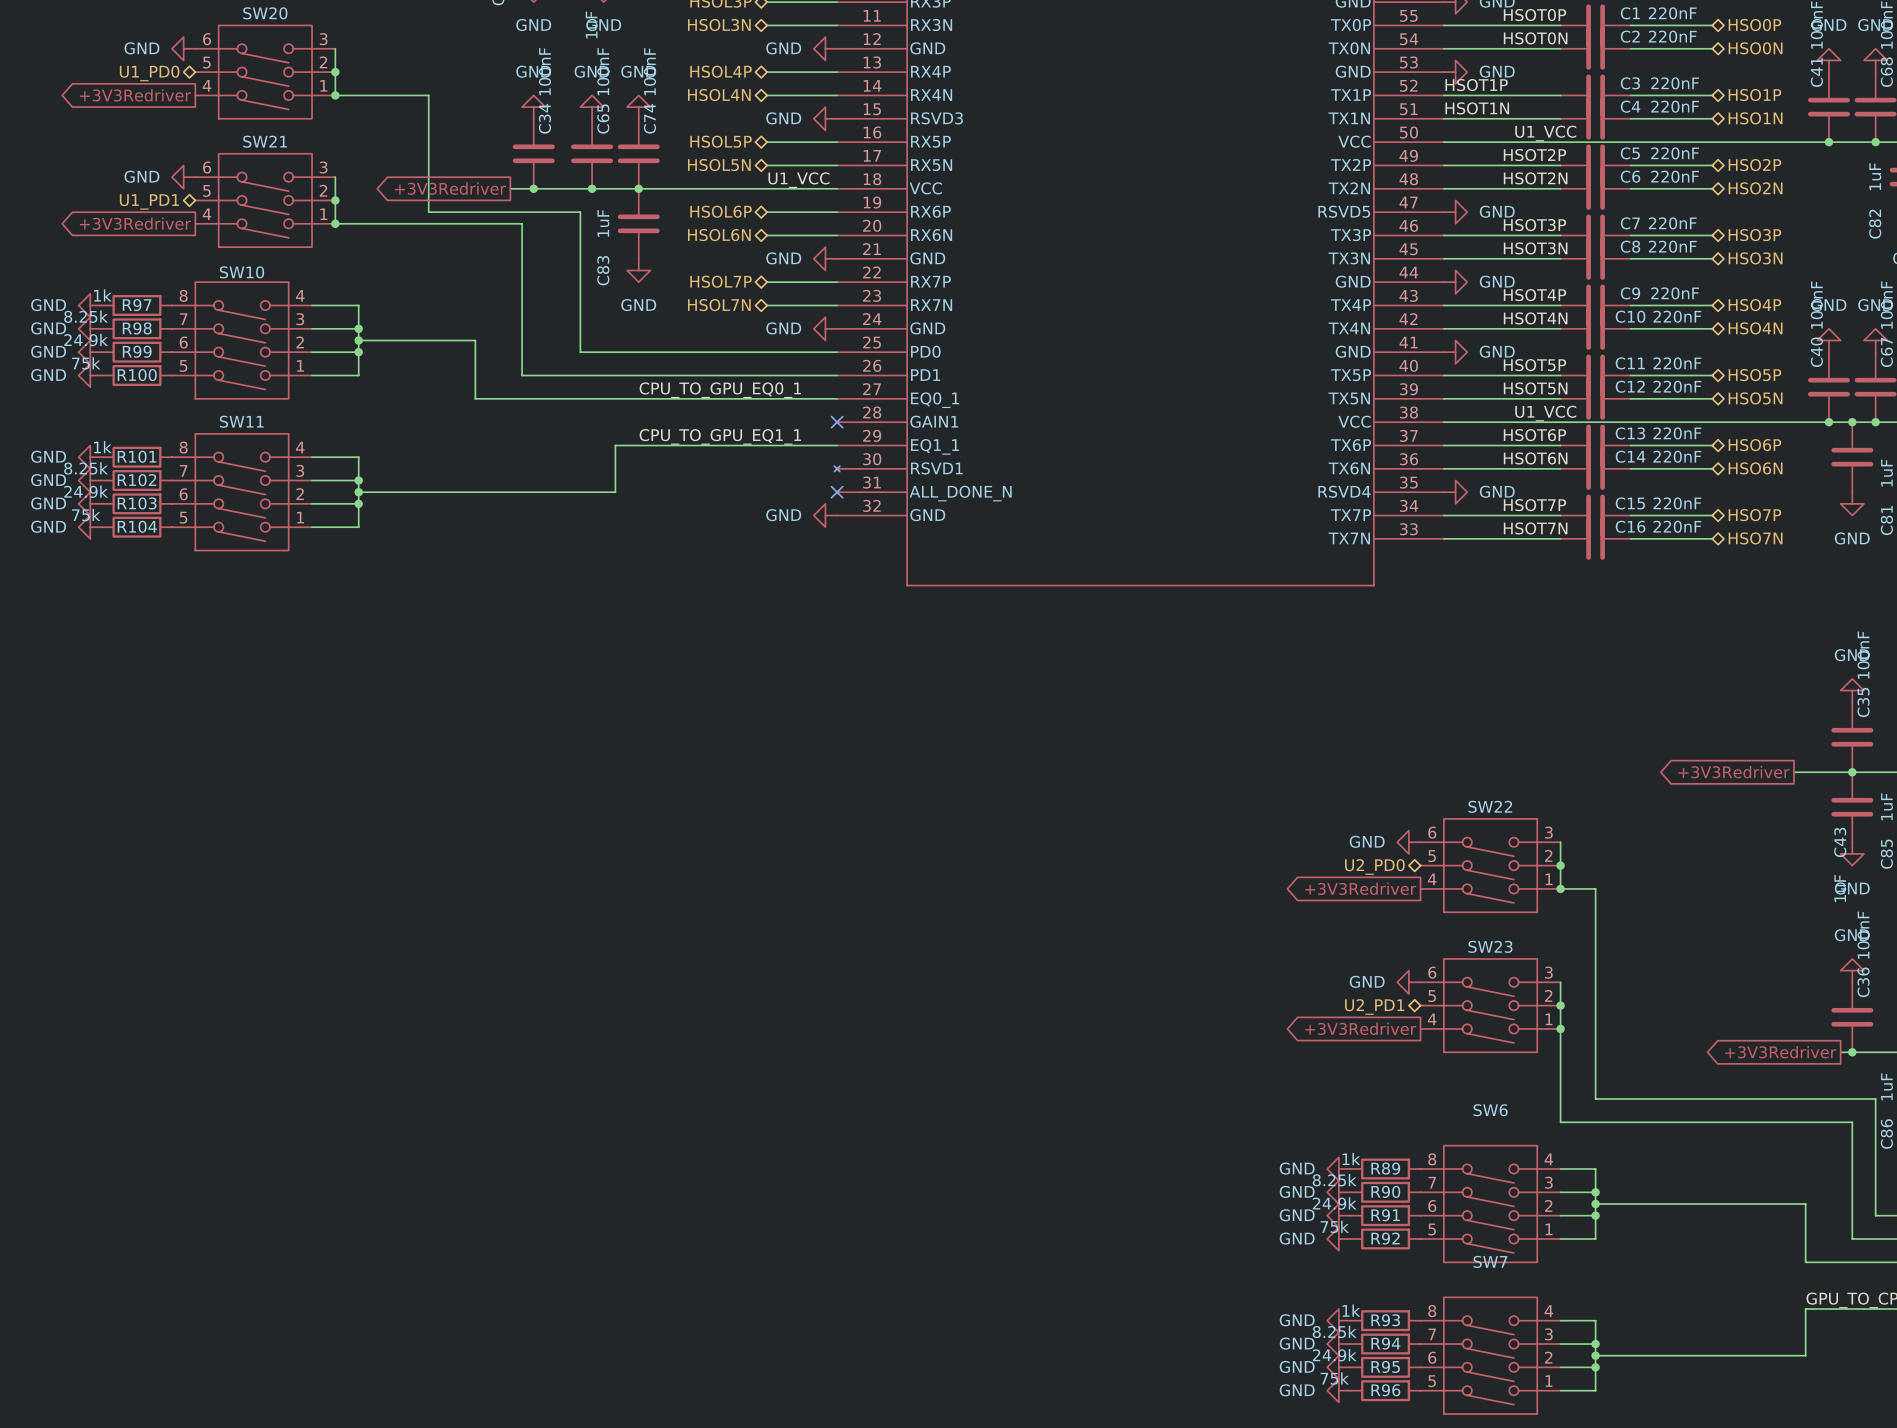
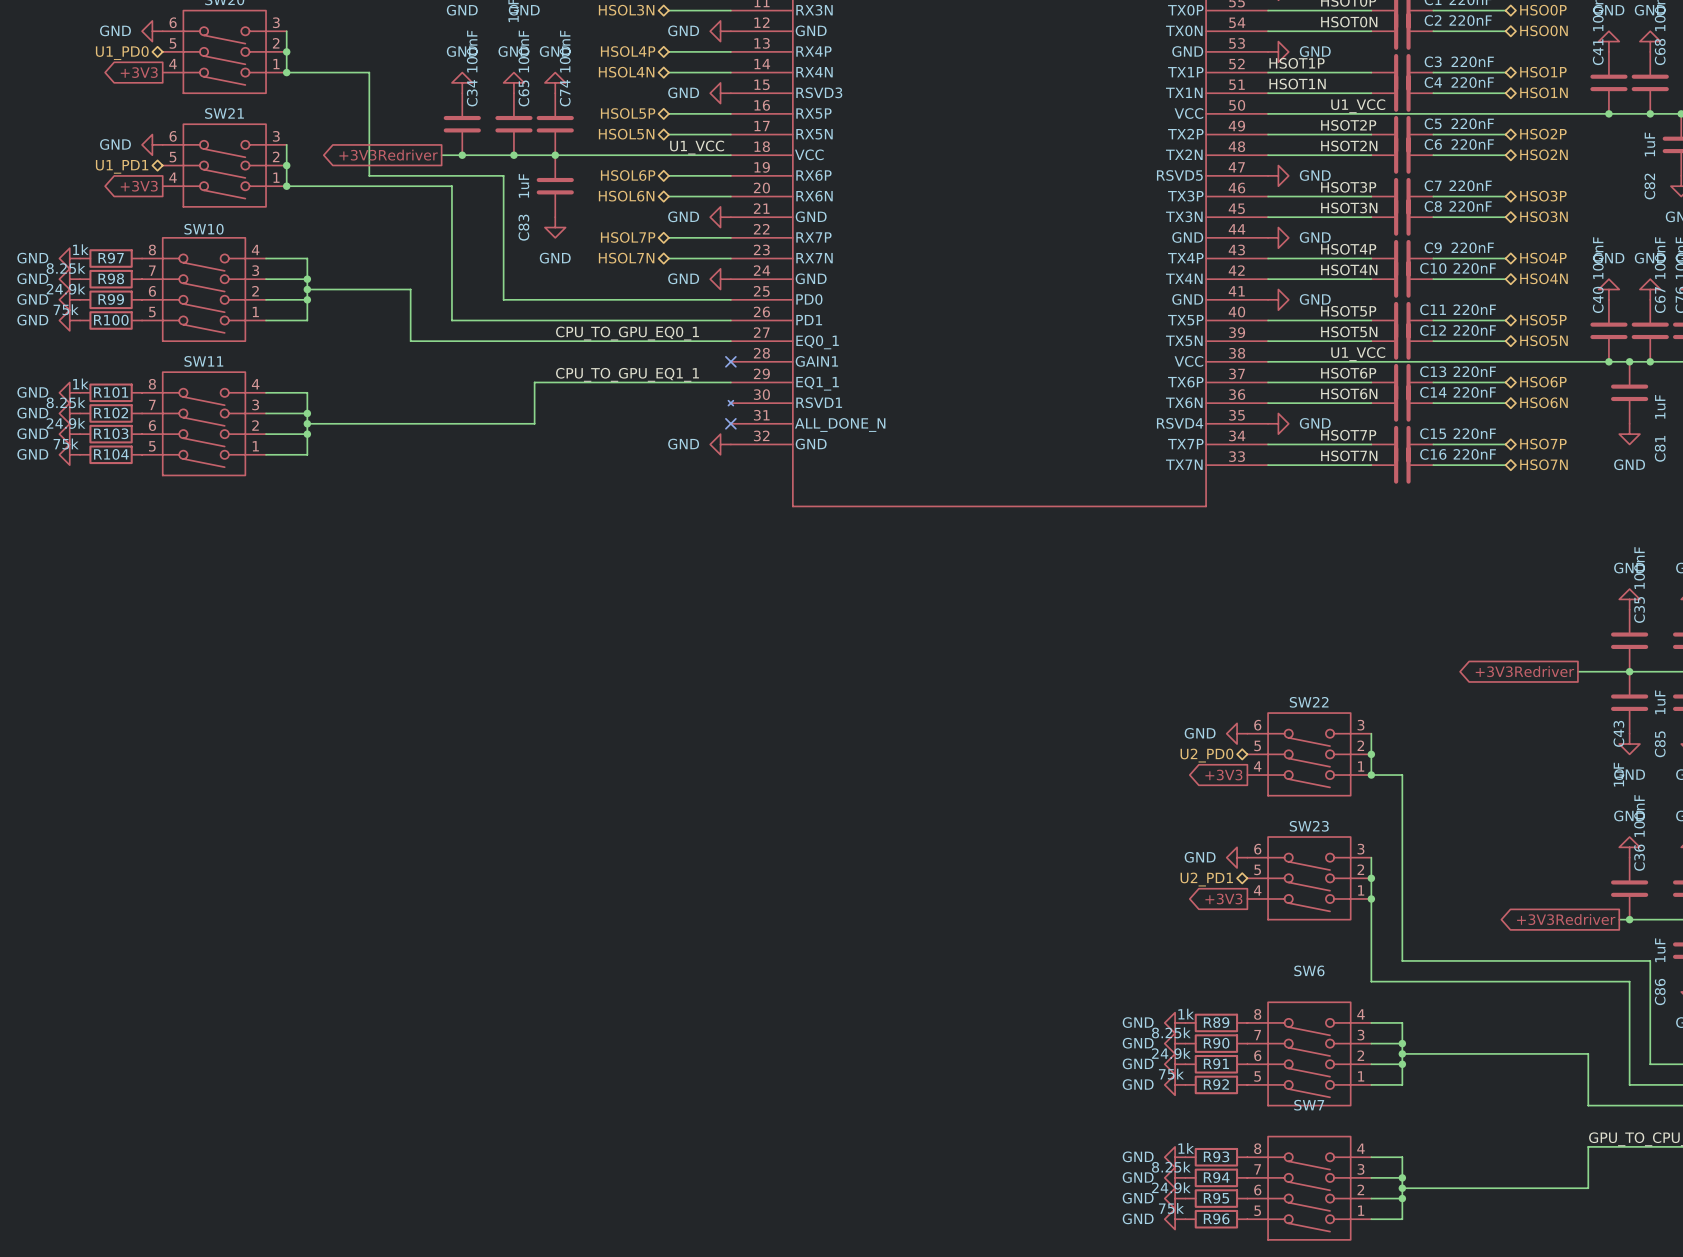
global label: +3V3Redriver (135, 95) -> +3V3 (139, 72)
global label: +3V3Redriver (135, 223) -> +3V3 (139, 186)
global label: +3V3Redriver (1360, 888) -> +3V3 (1223, 775)
global label: +3V3Redriver (1360, 1028) -> +3V3 (1223, 898)

